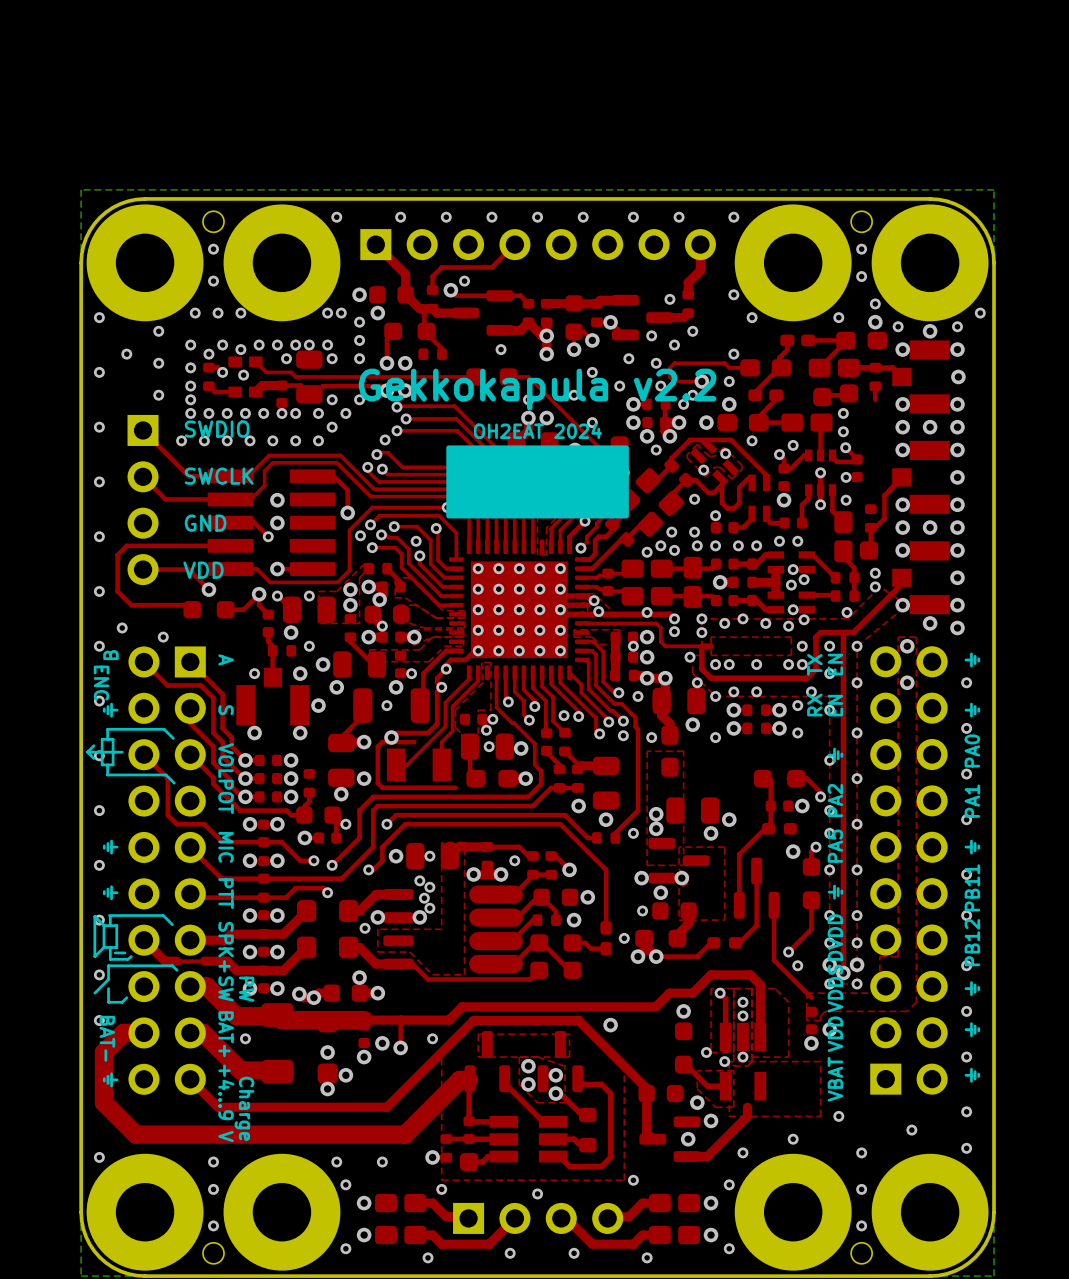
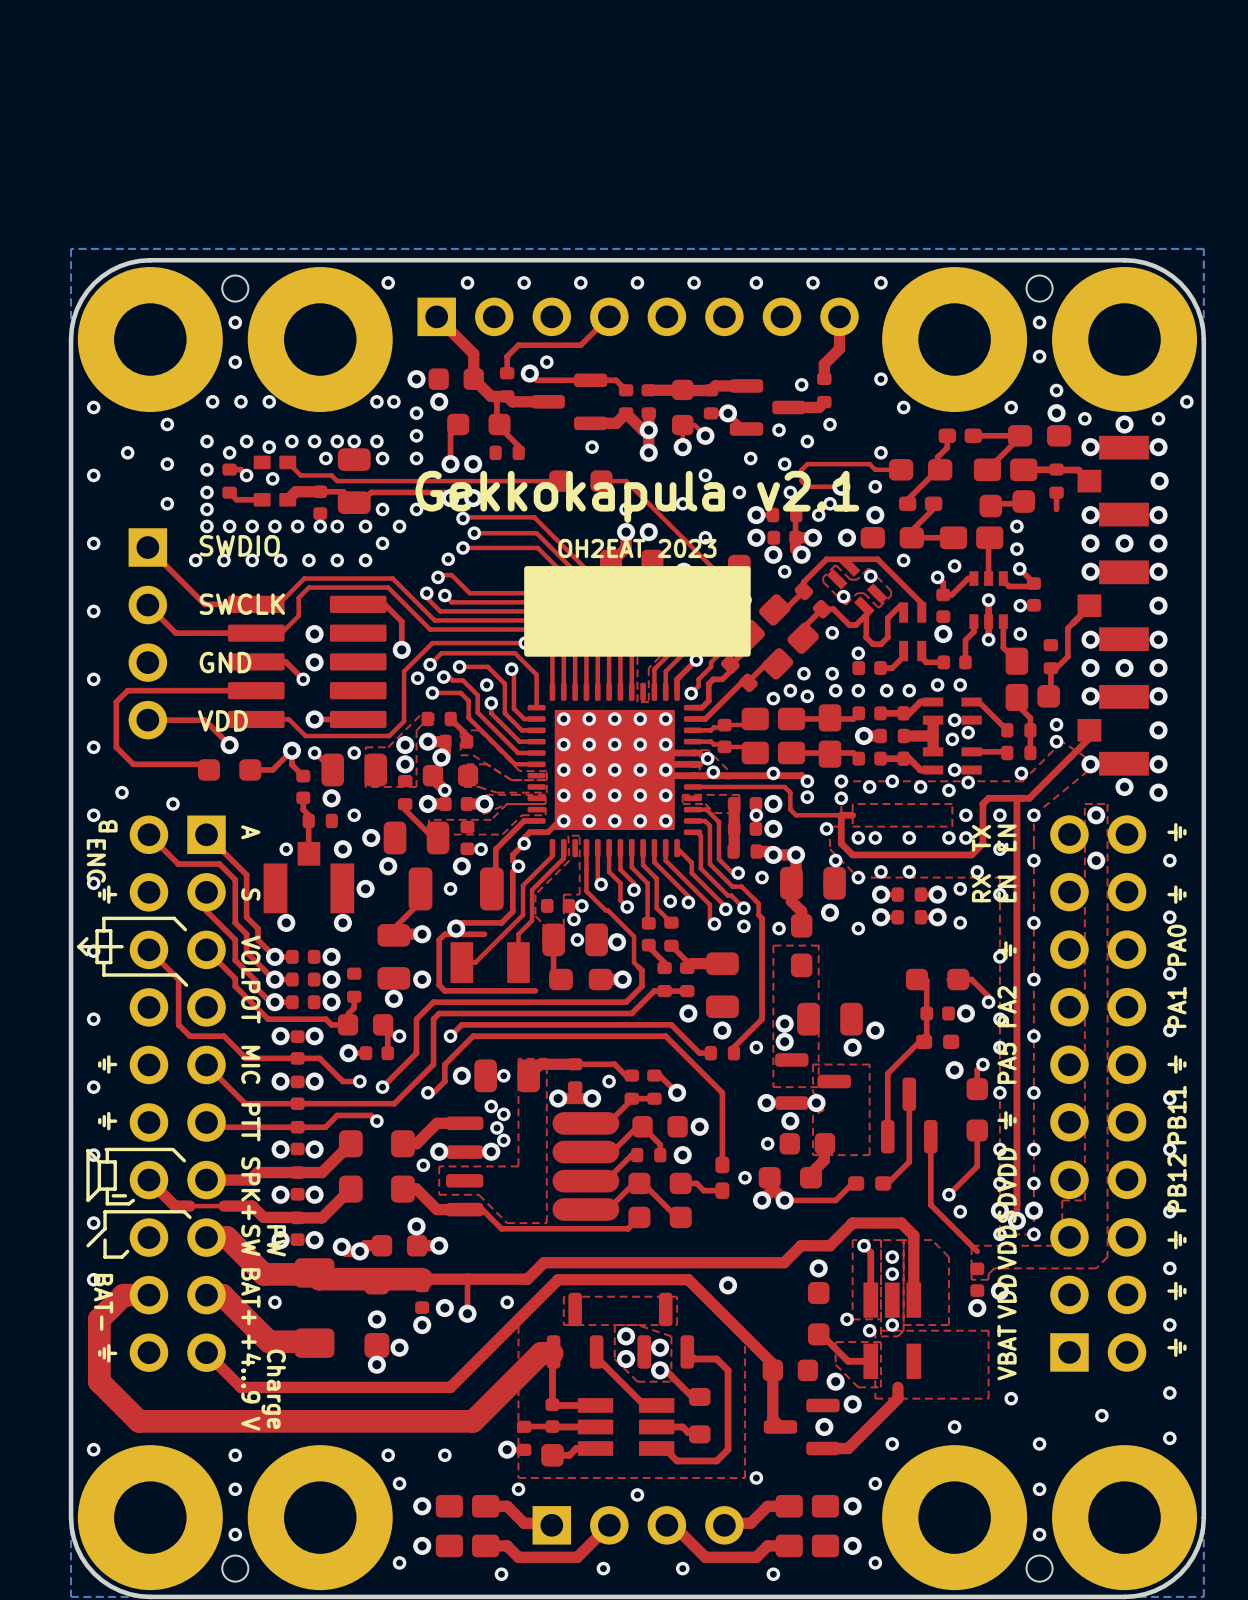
text: Gekkokapula v2.2 (537, 389) -> Gekkokapula v2.1 (637, 496)
text: OH2EAT 2024 (537, 430) -> OH2EAT 2023 (637, 548)

